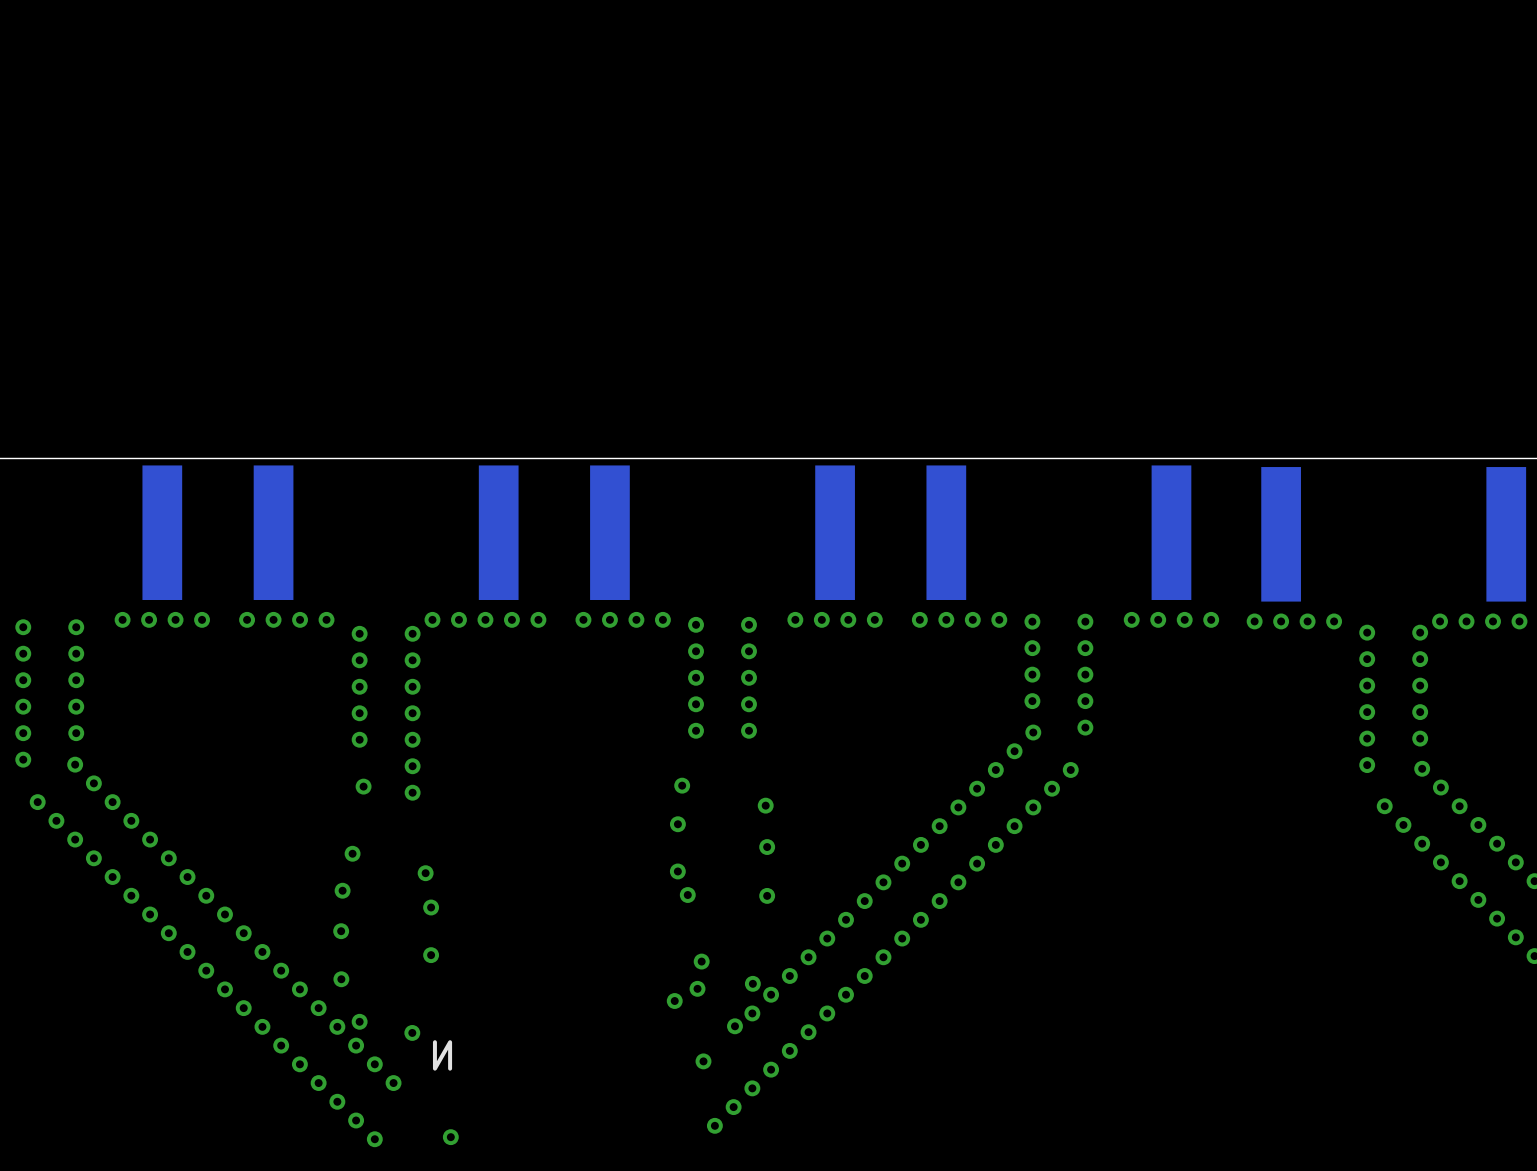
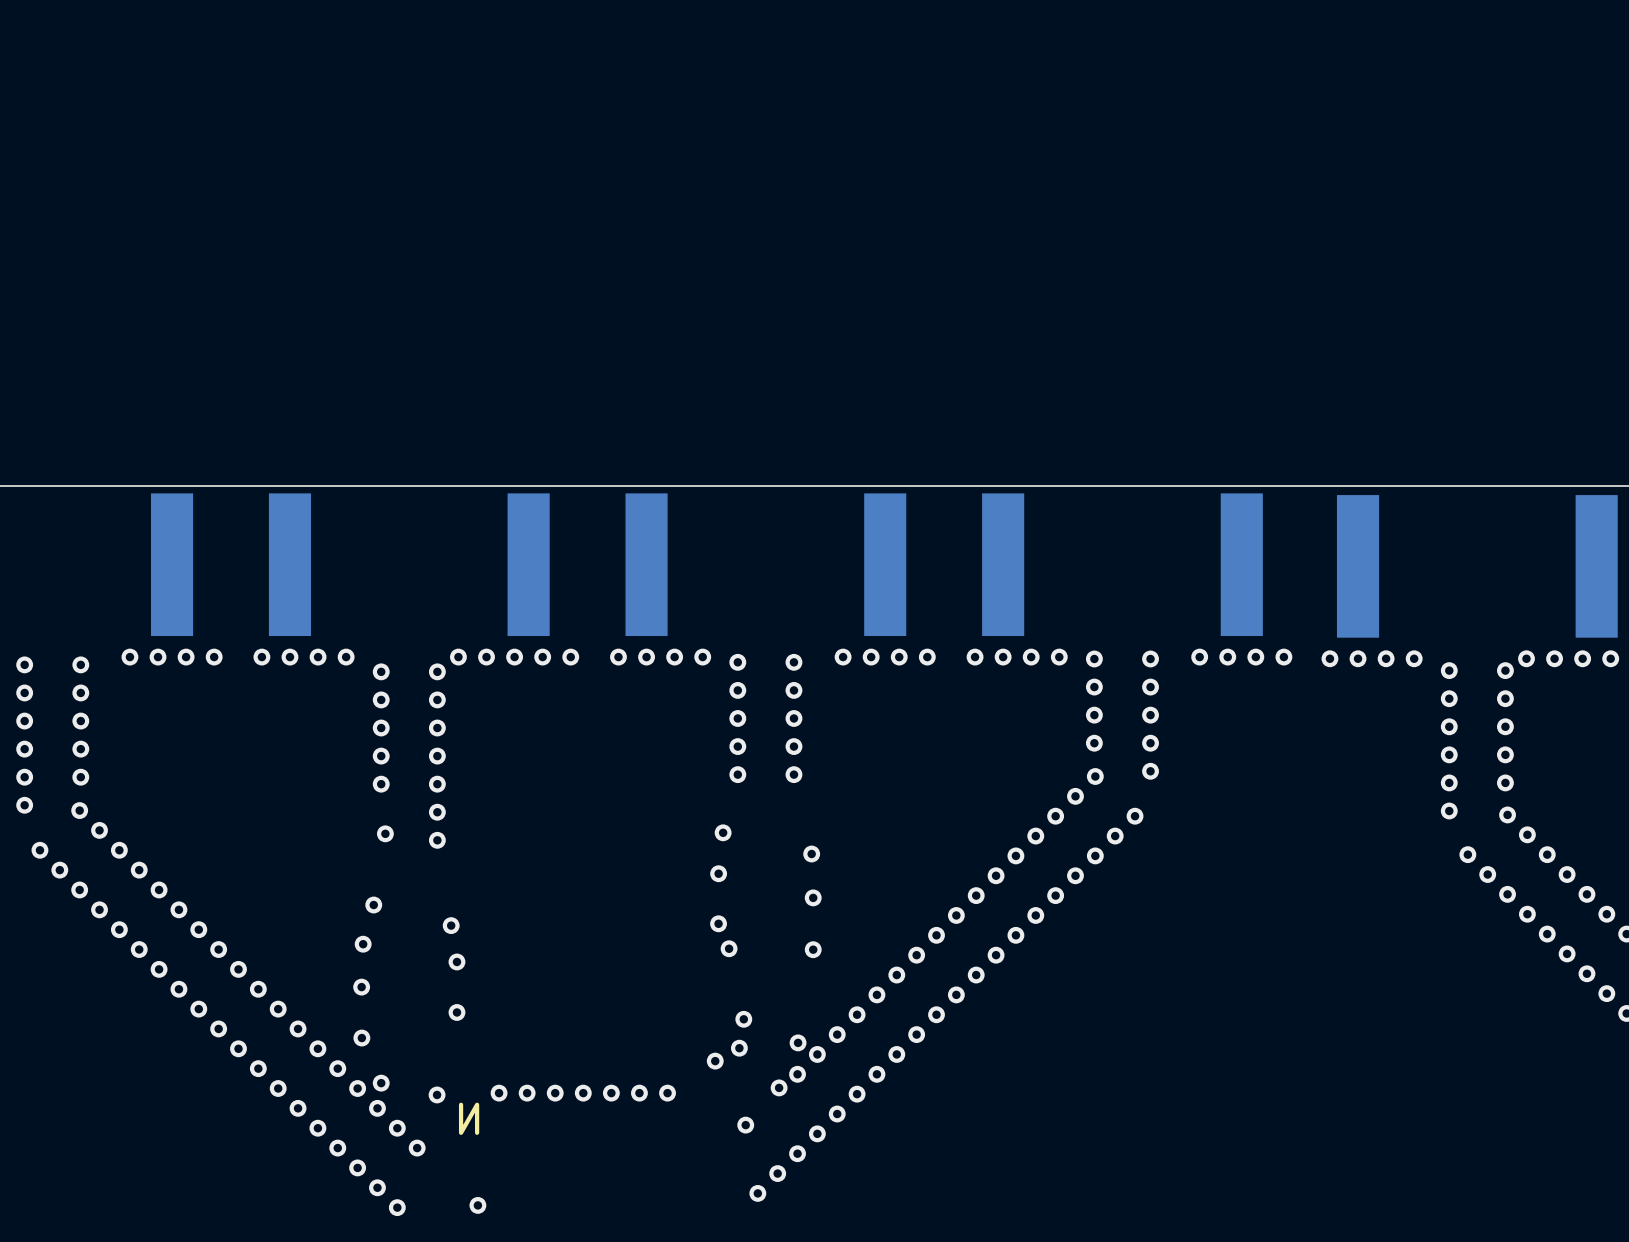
via: none -> (499, 1093)
via: none -> (527, 1093)
via: none -> (555, 1093)
via: none -> (583, 1093)
via: none -> (611, 1093)
via: none -> (639, 1093)
via: none -> (667, 1093)

